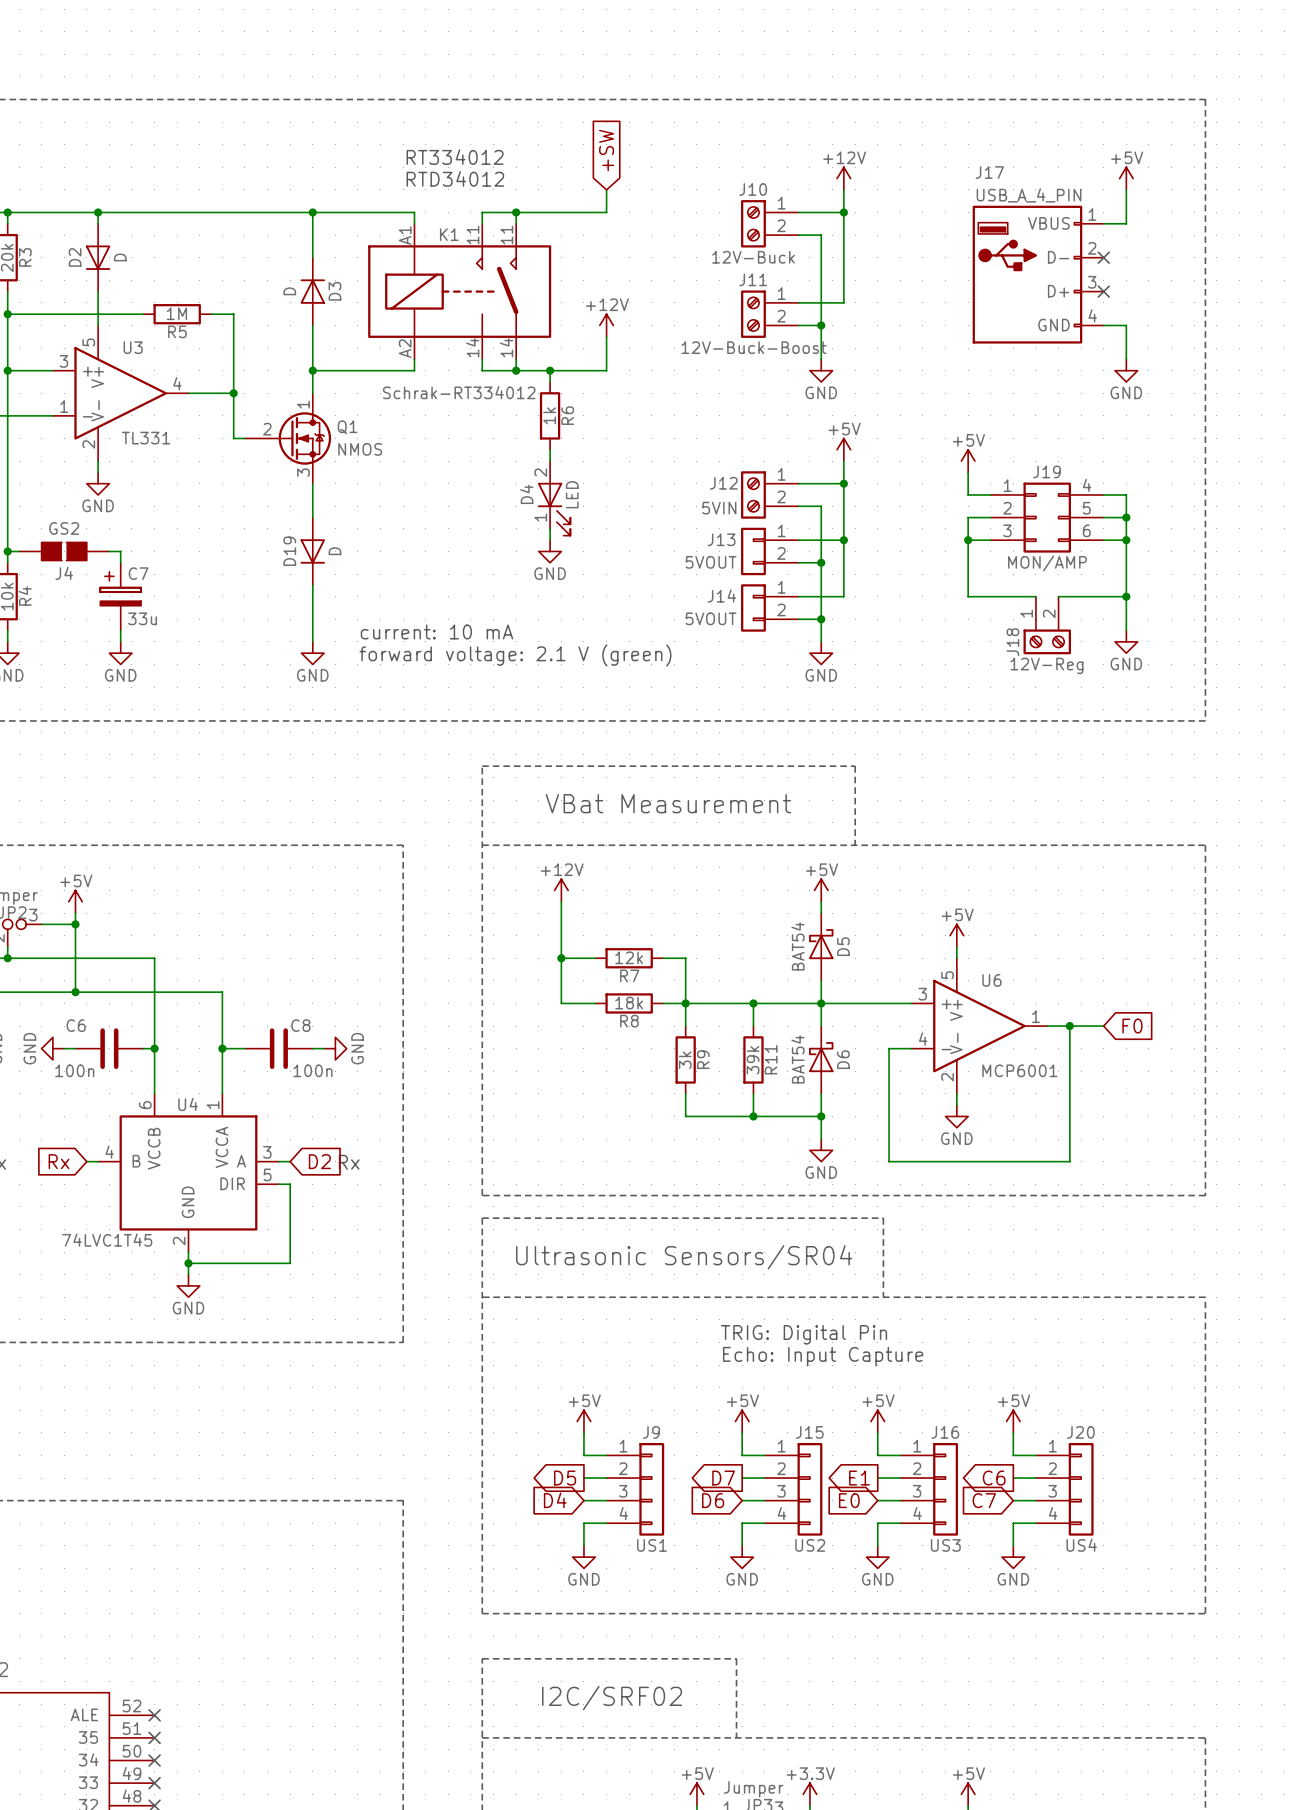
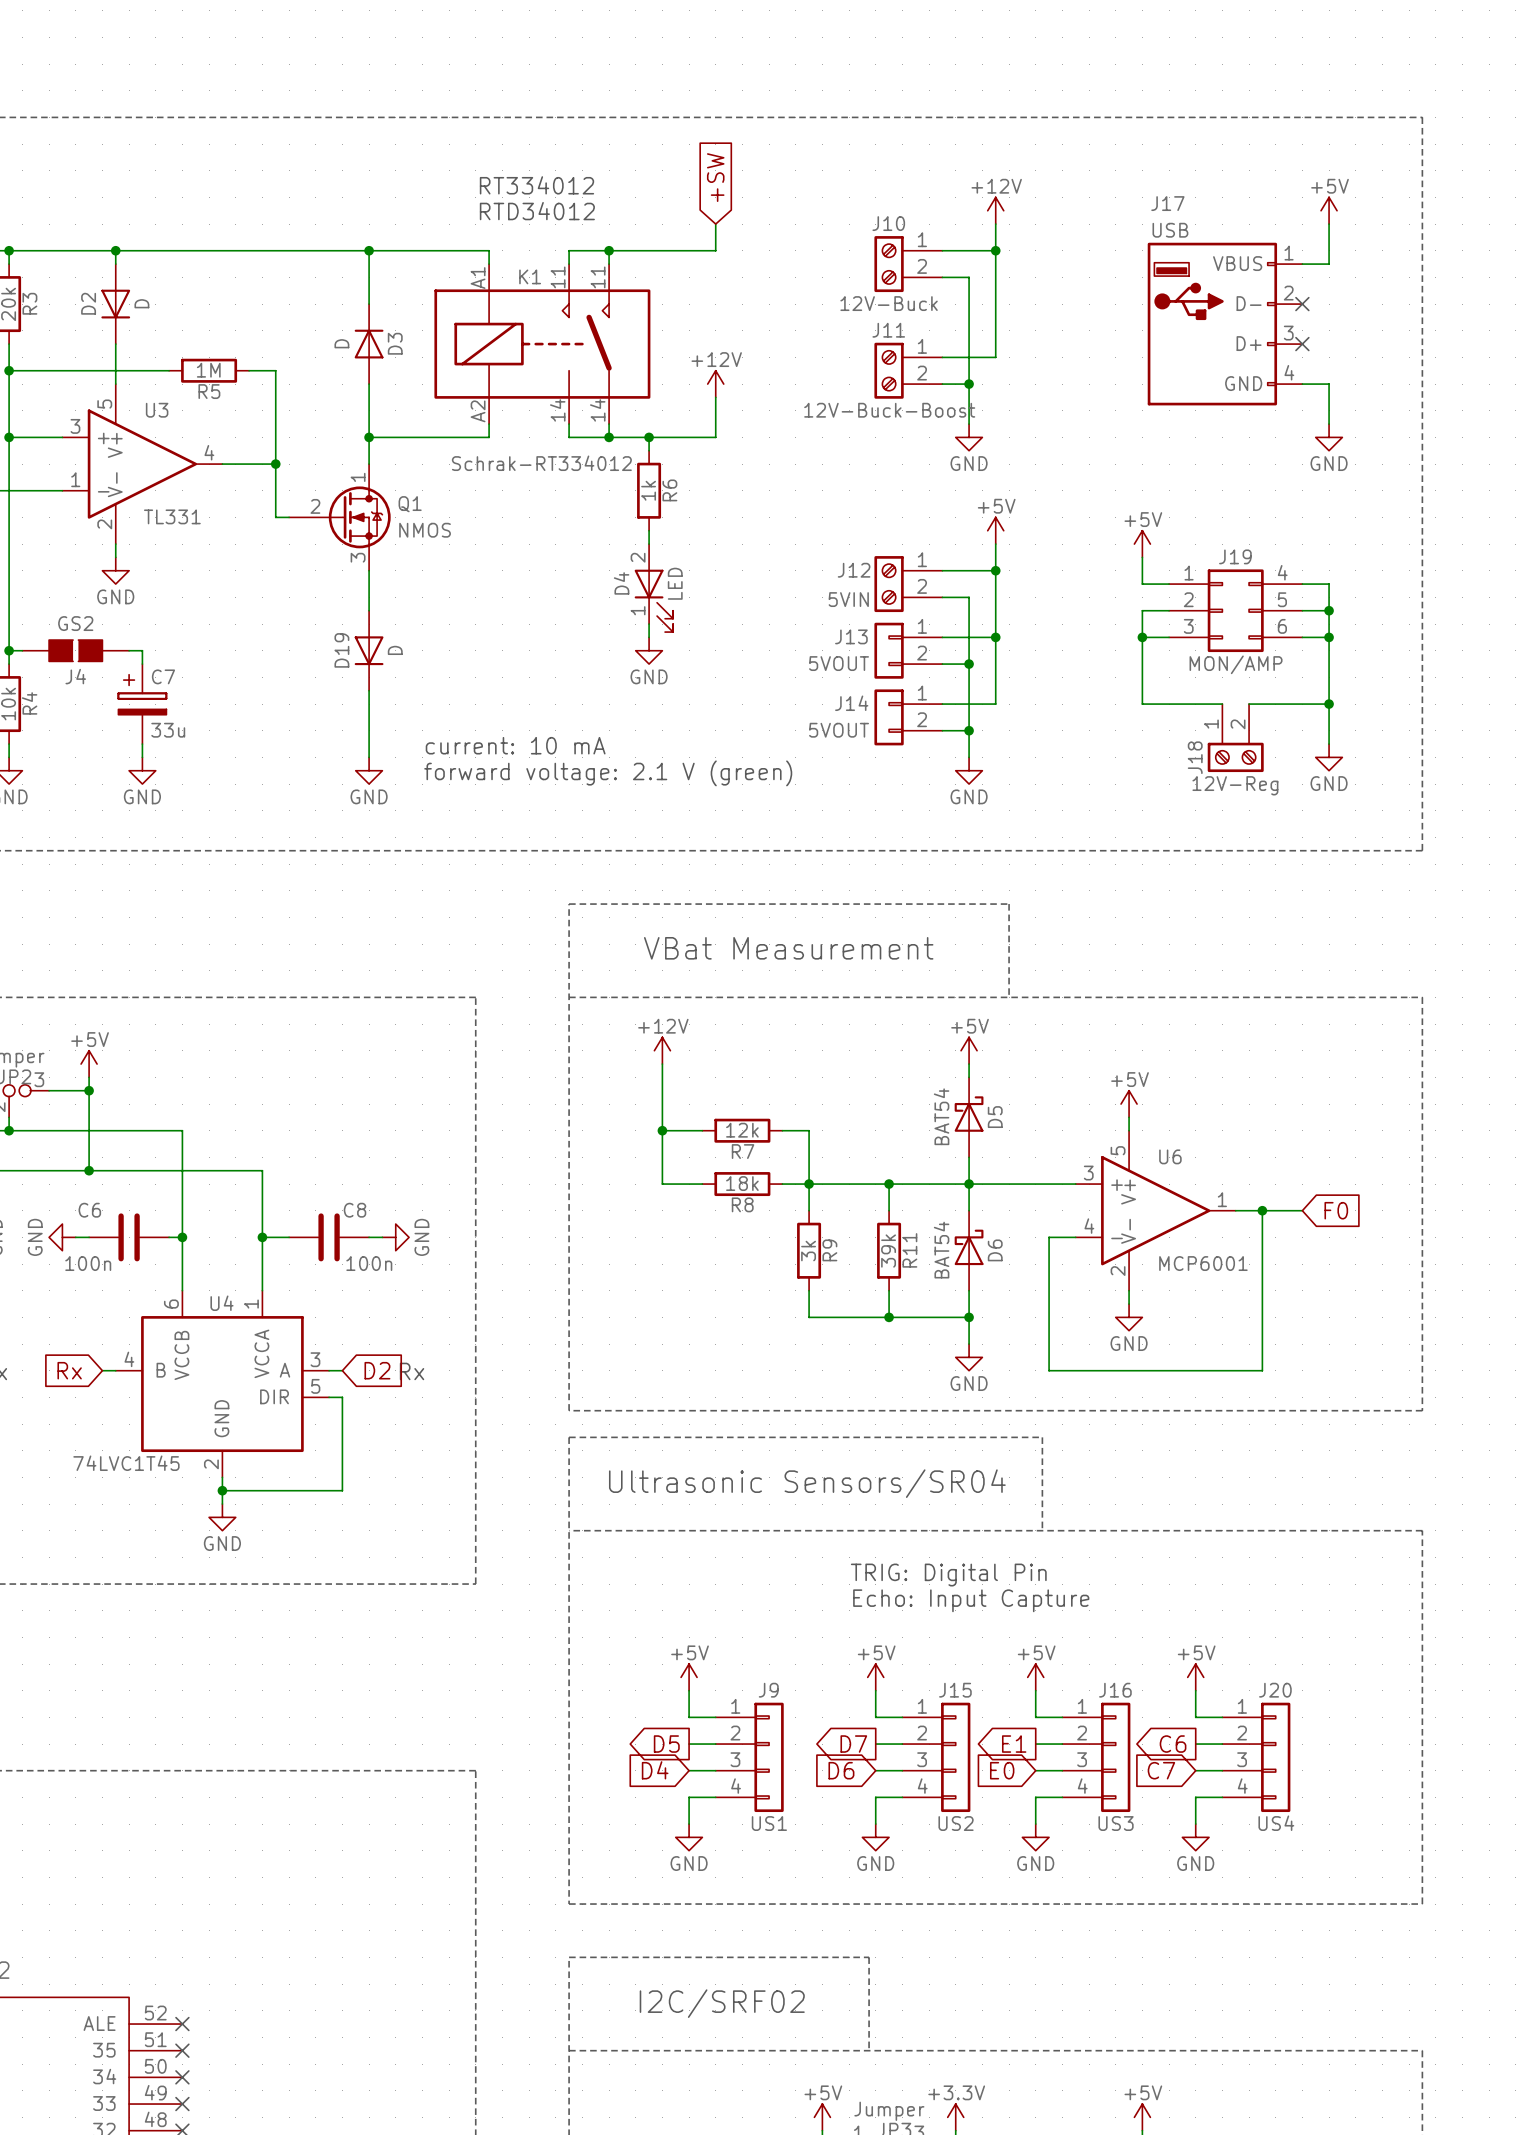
J17 value: USB_A_4_PIN (1029, 195) -> USB (1170, 230)

